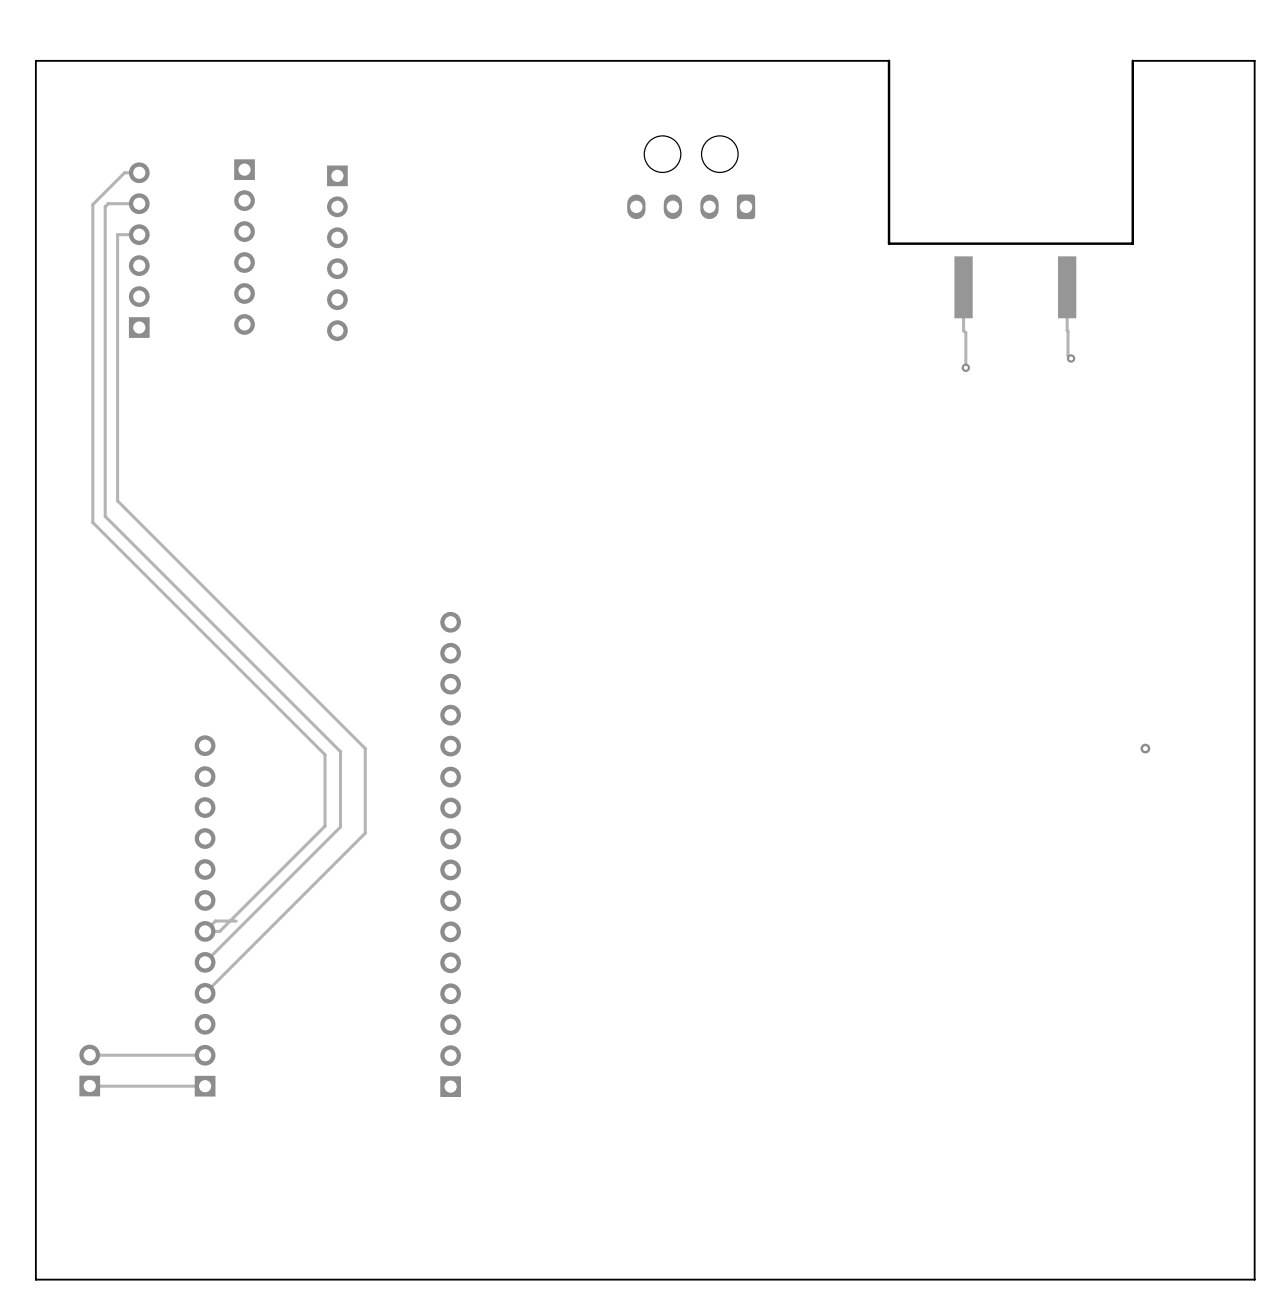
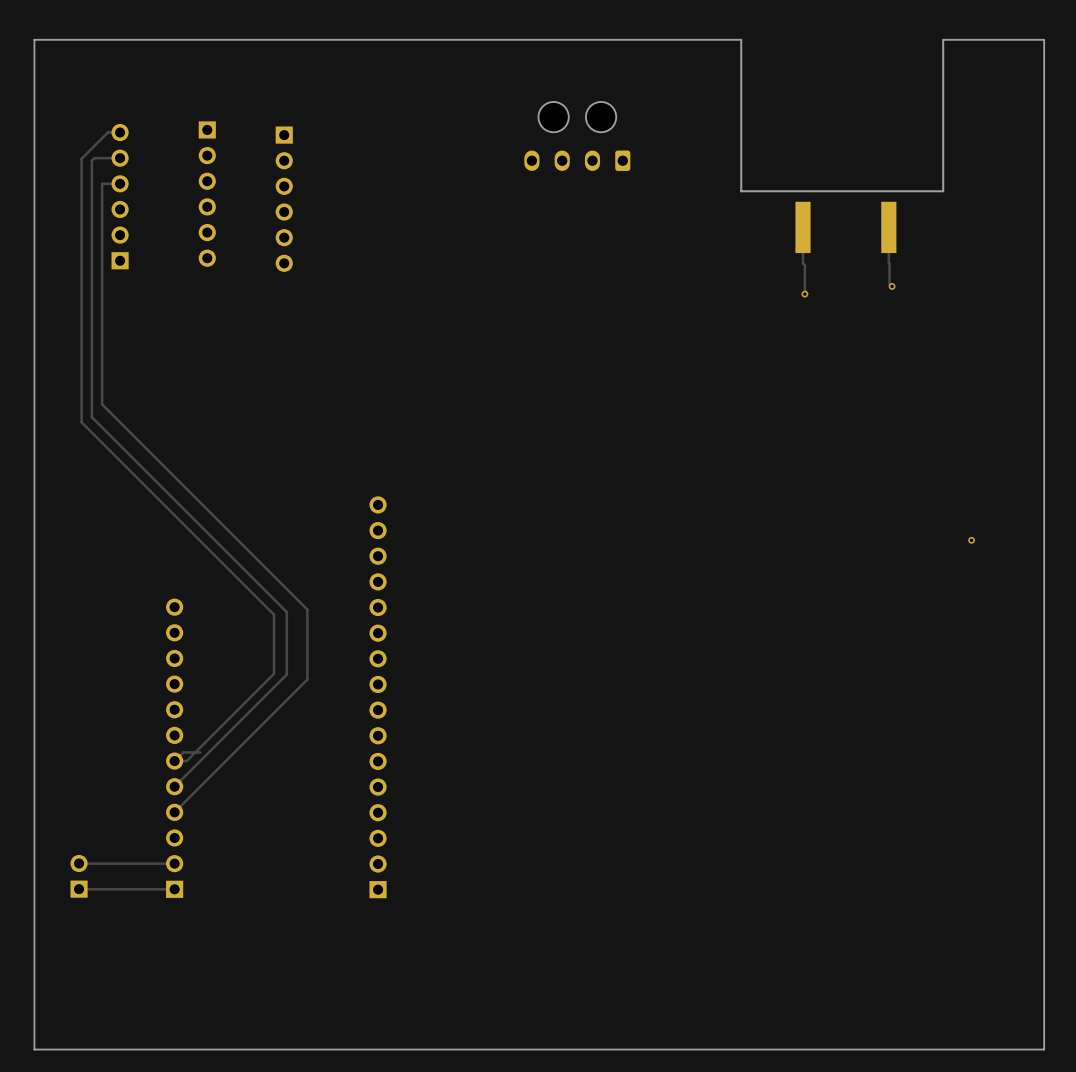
via: none -> (971, 540)
via: (1145, 748) -> none

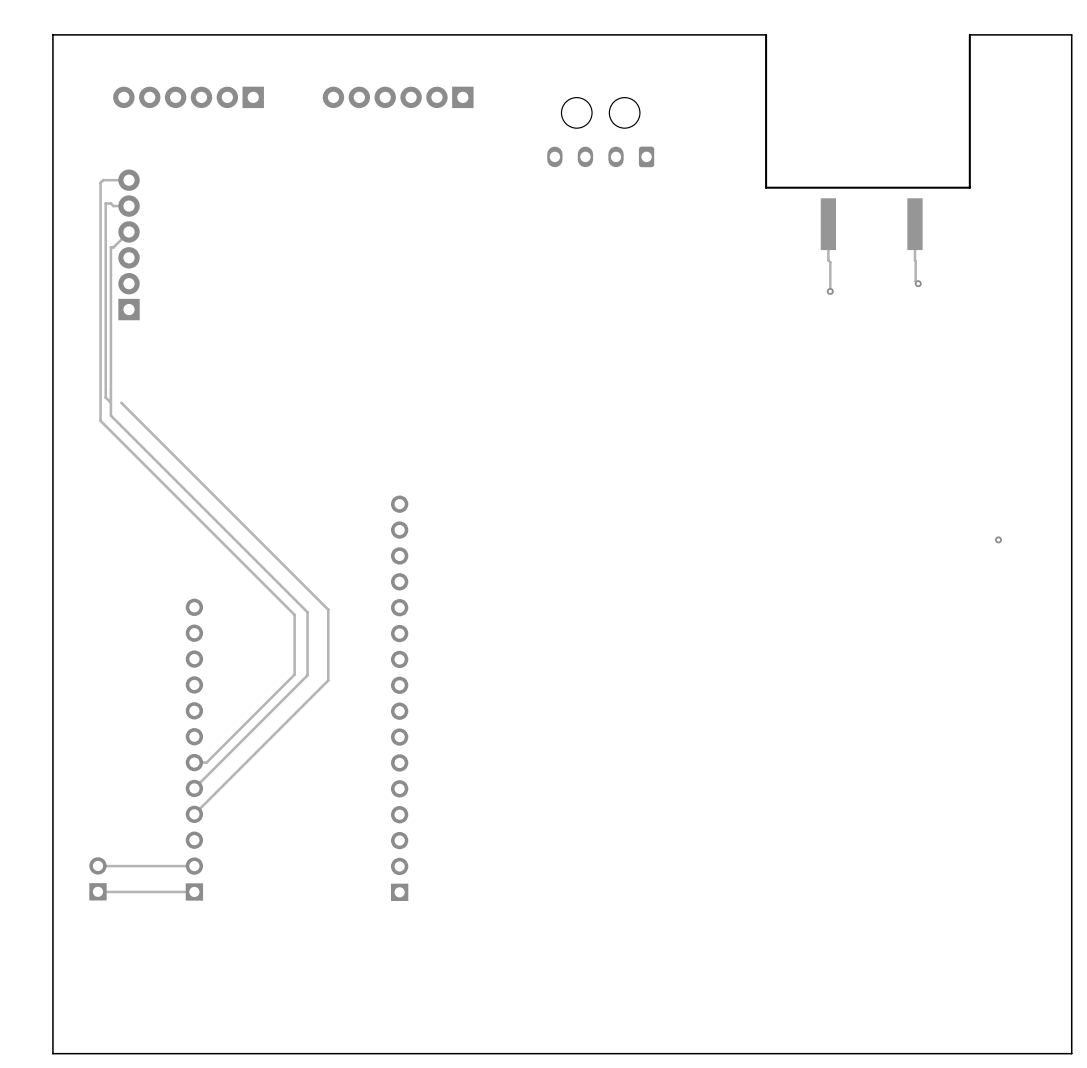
part: none -> (188, 97)
part: none -> (398, 97)
track: (120, 132) (107, 132) (81, 158) (81, 186) -> (121, 180) (103, 180) (100, 182)
track: (120, 158) (94, 158) (91, 160) (91, 250) -> (129, 231) (113, 247) (110, 247)
track: (102, 183) (102, 404) -> none
part: (207, 194) -> none
part: (120, 196) -> none
part: (284, 199) -> none
track: none -> (129, 206) (113, 206) (110, 203) (105, 203) (105, 397) (110, 402)
part: none -> (129, 244)
track: (200, 752) (183, 752) (174, 761) -> none

